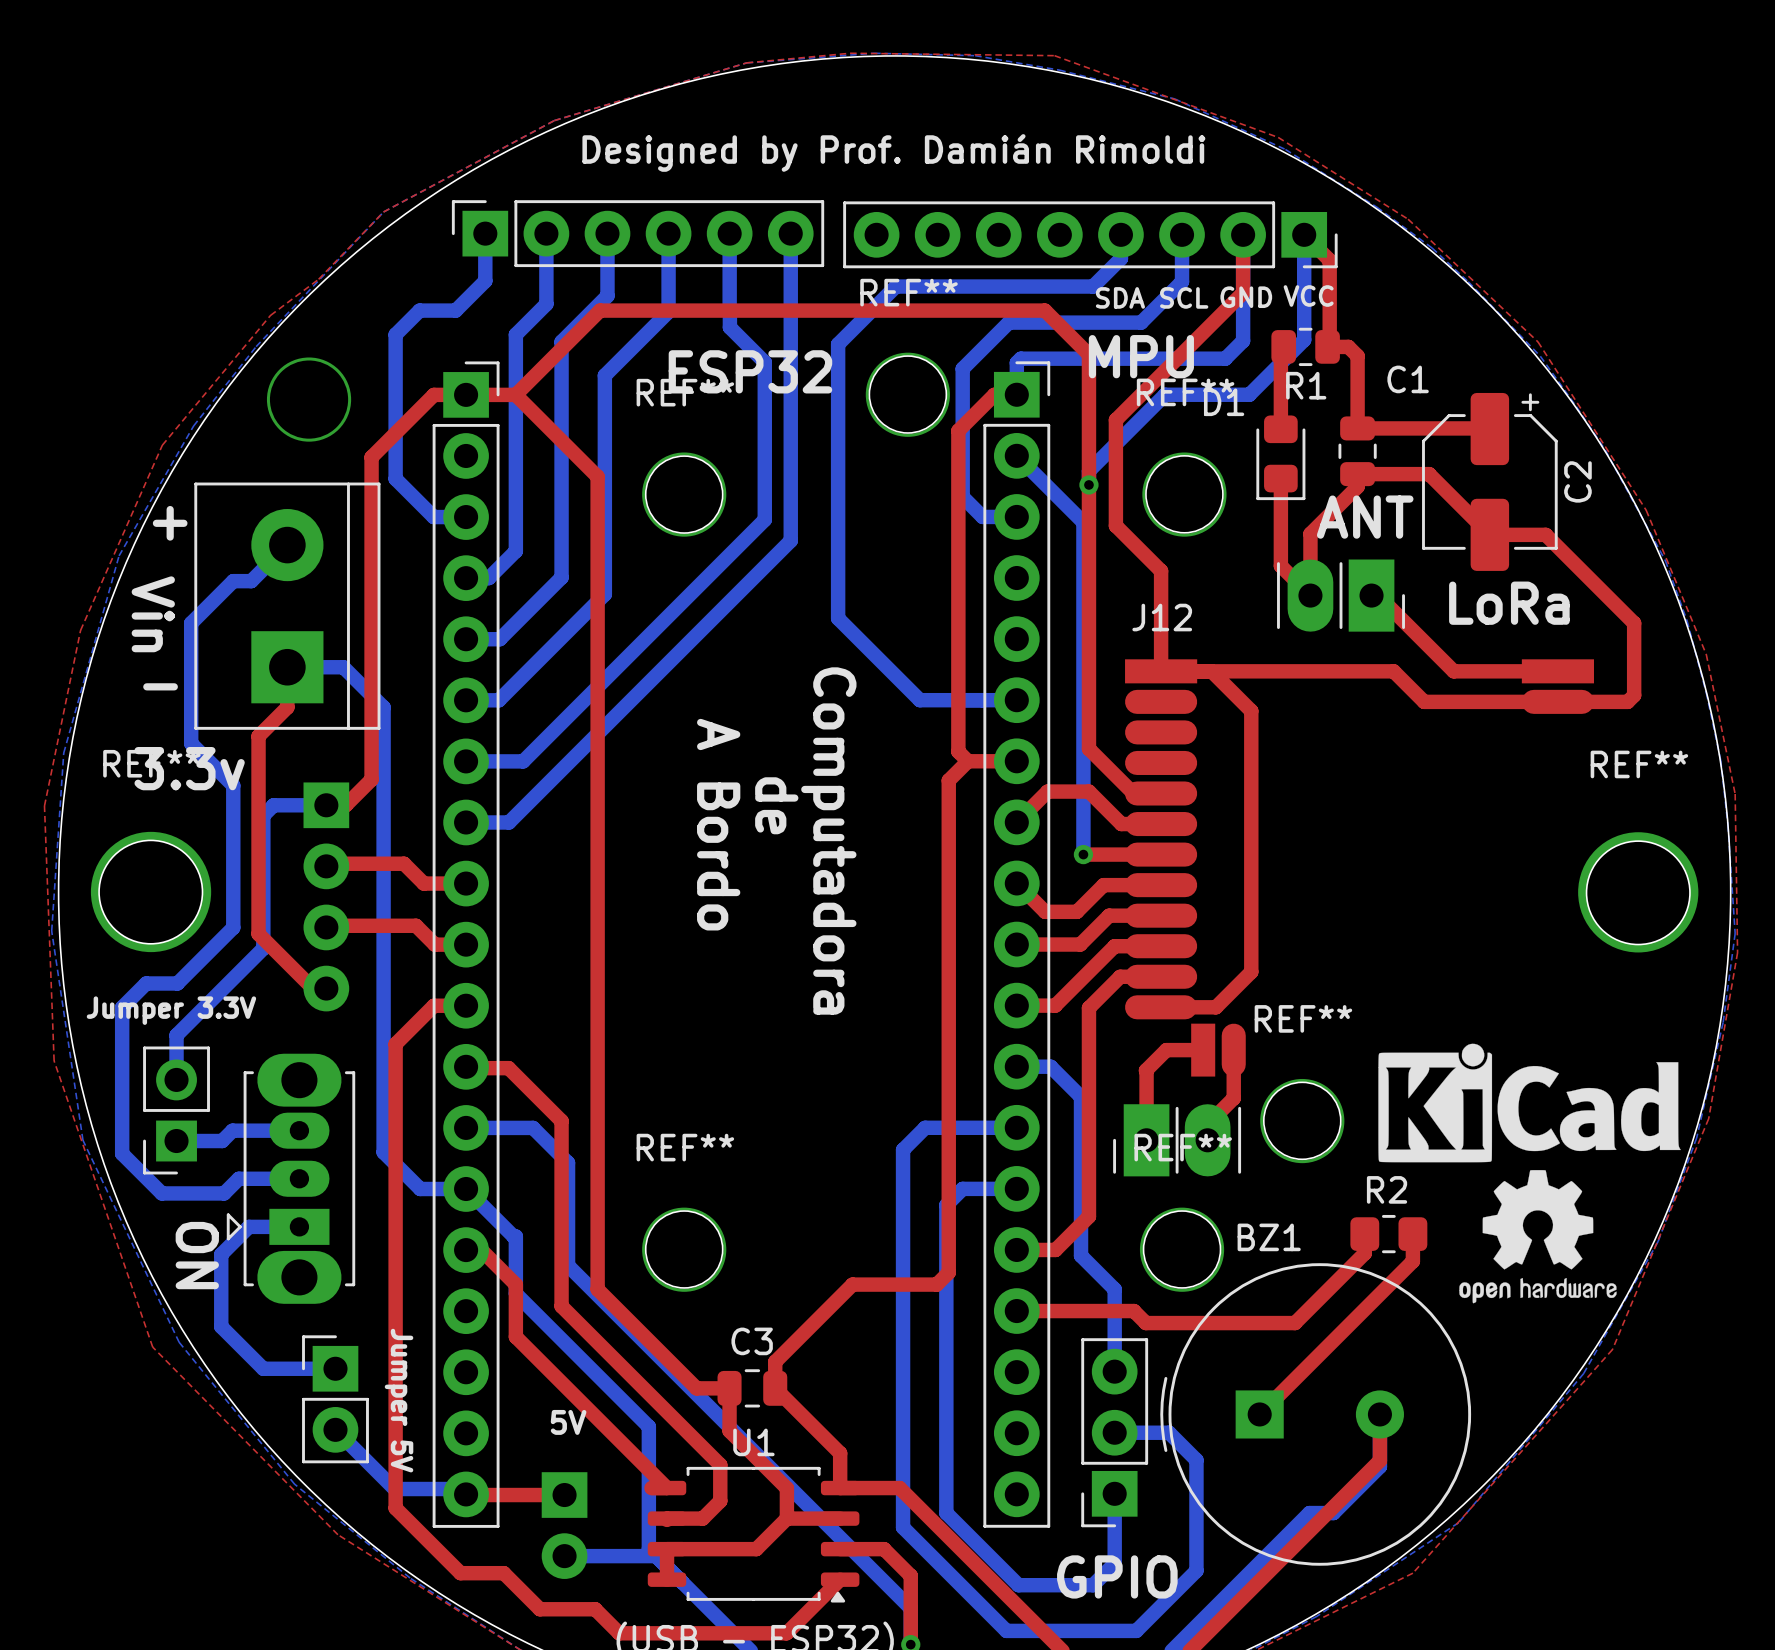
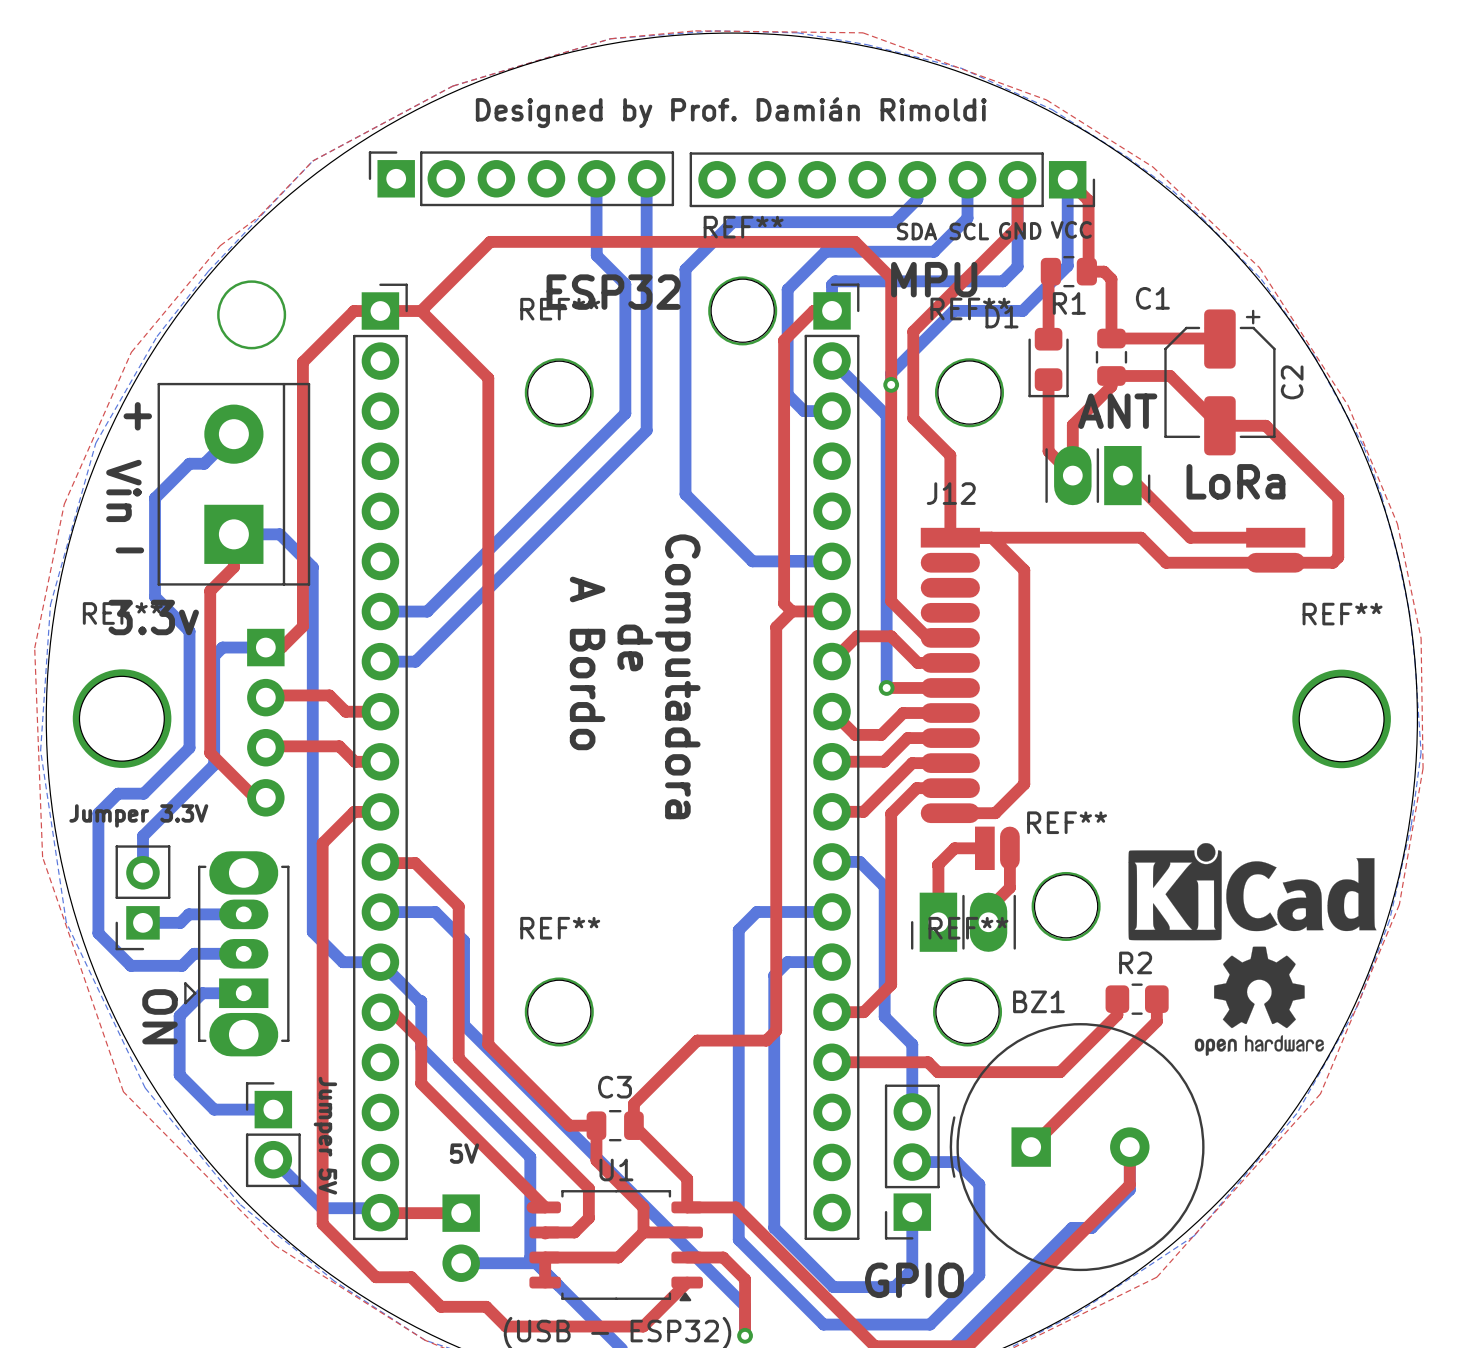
bottom track: (485, 233) (485, 281) (455, 310) (419, 310) (395, 334) (395, 478) (433, 517) (466, 517) -> none
bottom track: (546, 233) (546, 304) (515, 334) (515, 551) (488, 578) (466, 578) -> none
bottom track: (607, 233) (607, 295) (561, 341) (561, 577) (499, 639) (466, 639) -> none
bottom track: (668, 233) (668, 311) (604, 375) (604, 594) (498, 700) (466, 700) -> none

